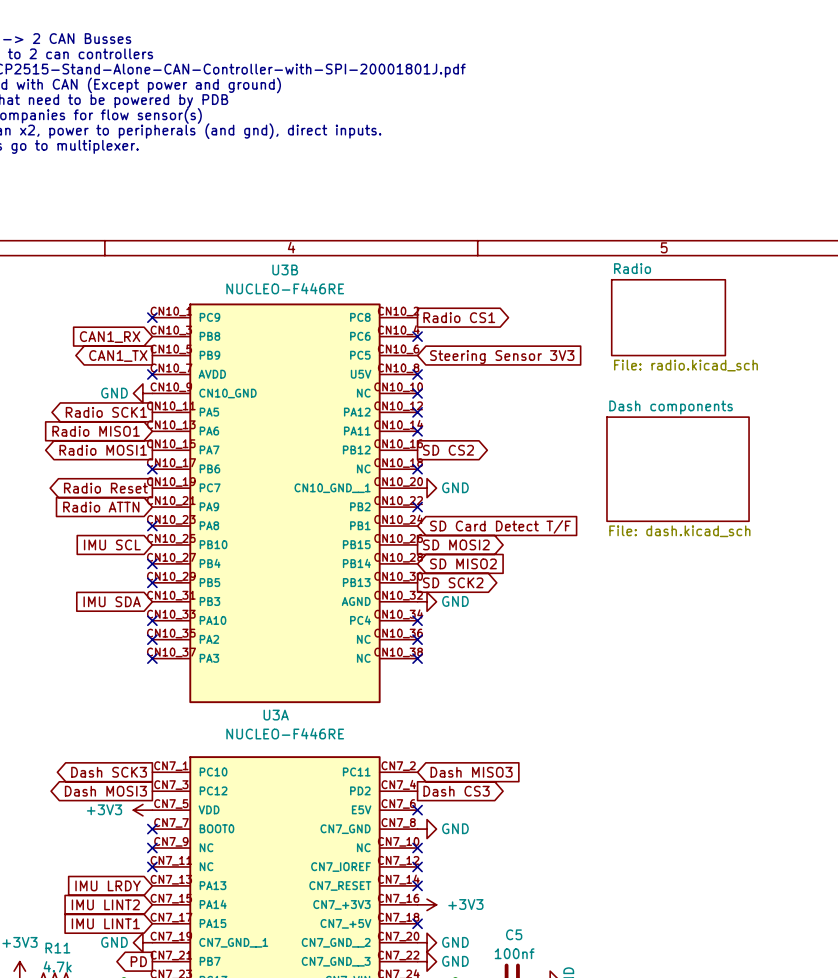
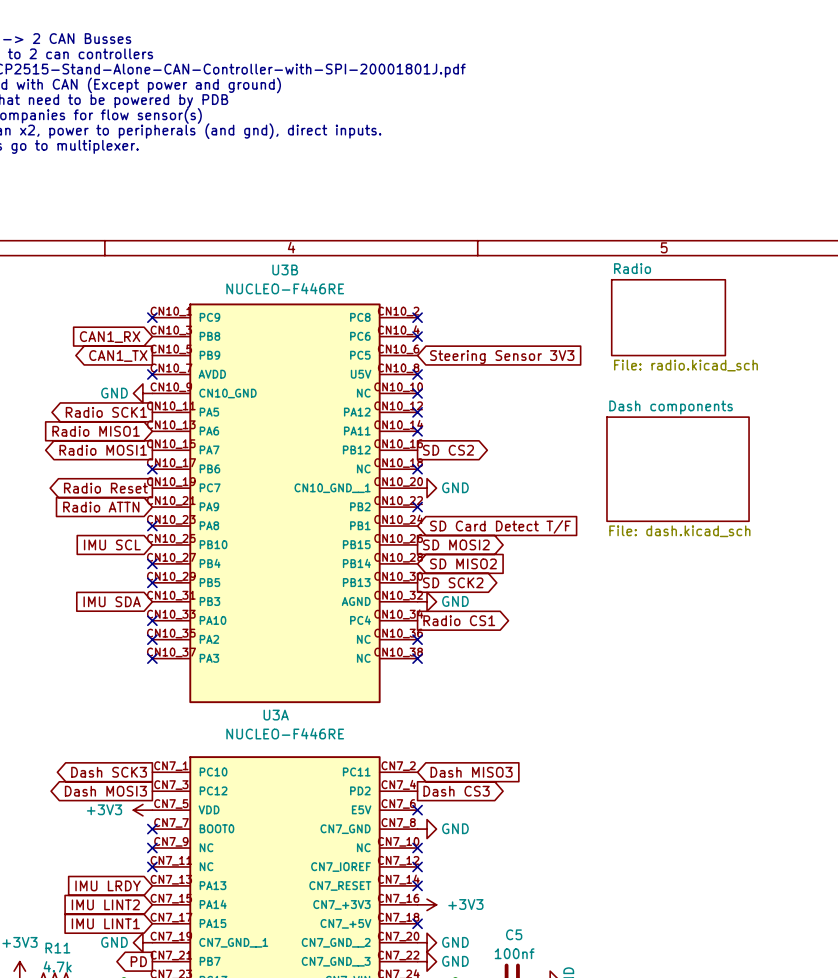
no-connect mark: none -> (417, 317)
global label: Radio CS1 (459, 317) -> none
no-connect mark: (417, 620) -> none
global label: none -> Radio CS1 (459, 620)

